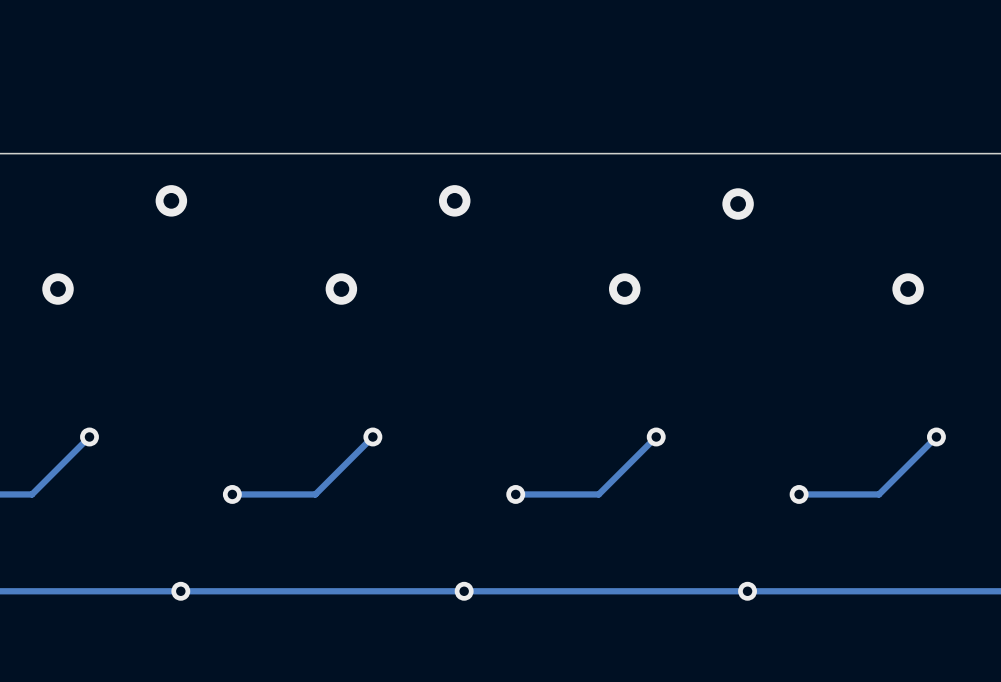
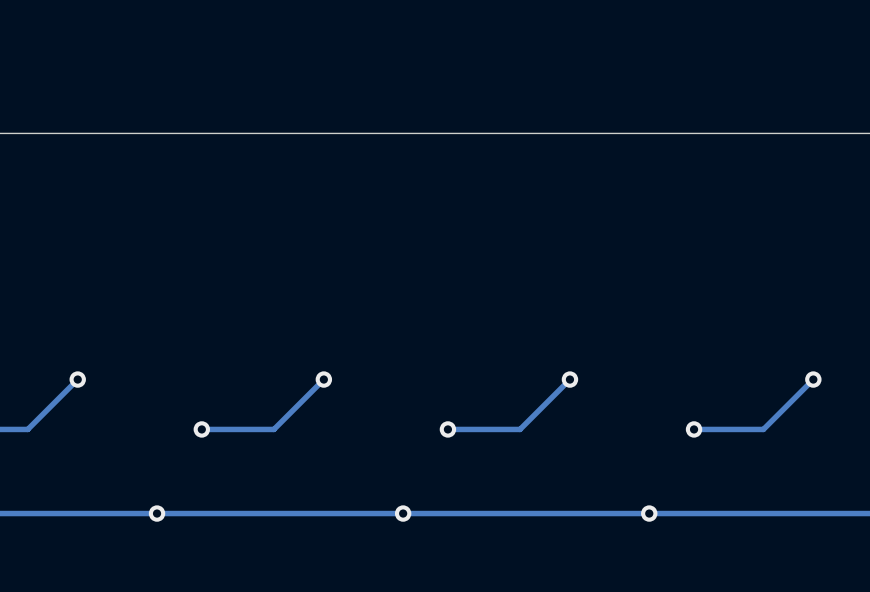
via: (171, 200) -> none
via: (454, 200) -> none
via: (738, 204) -> none
via: (58, 289) -> none
via: (341, 289) -> none
via: (624, 289) -> none
via: (908, 289) -> none

